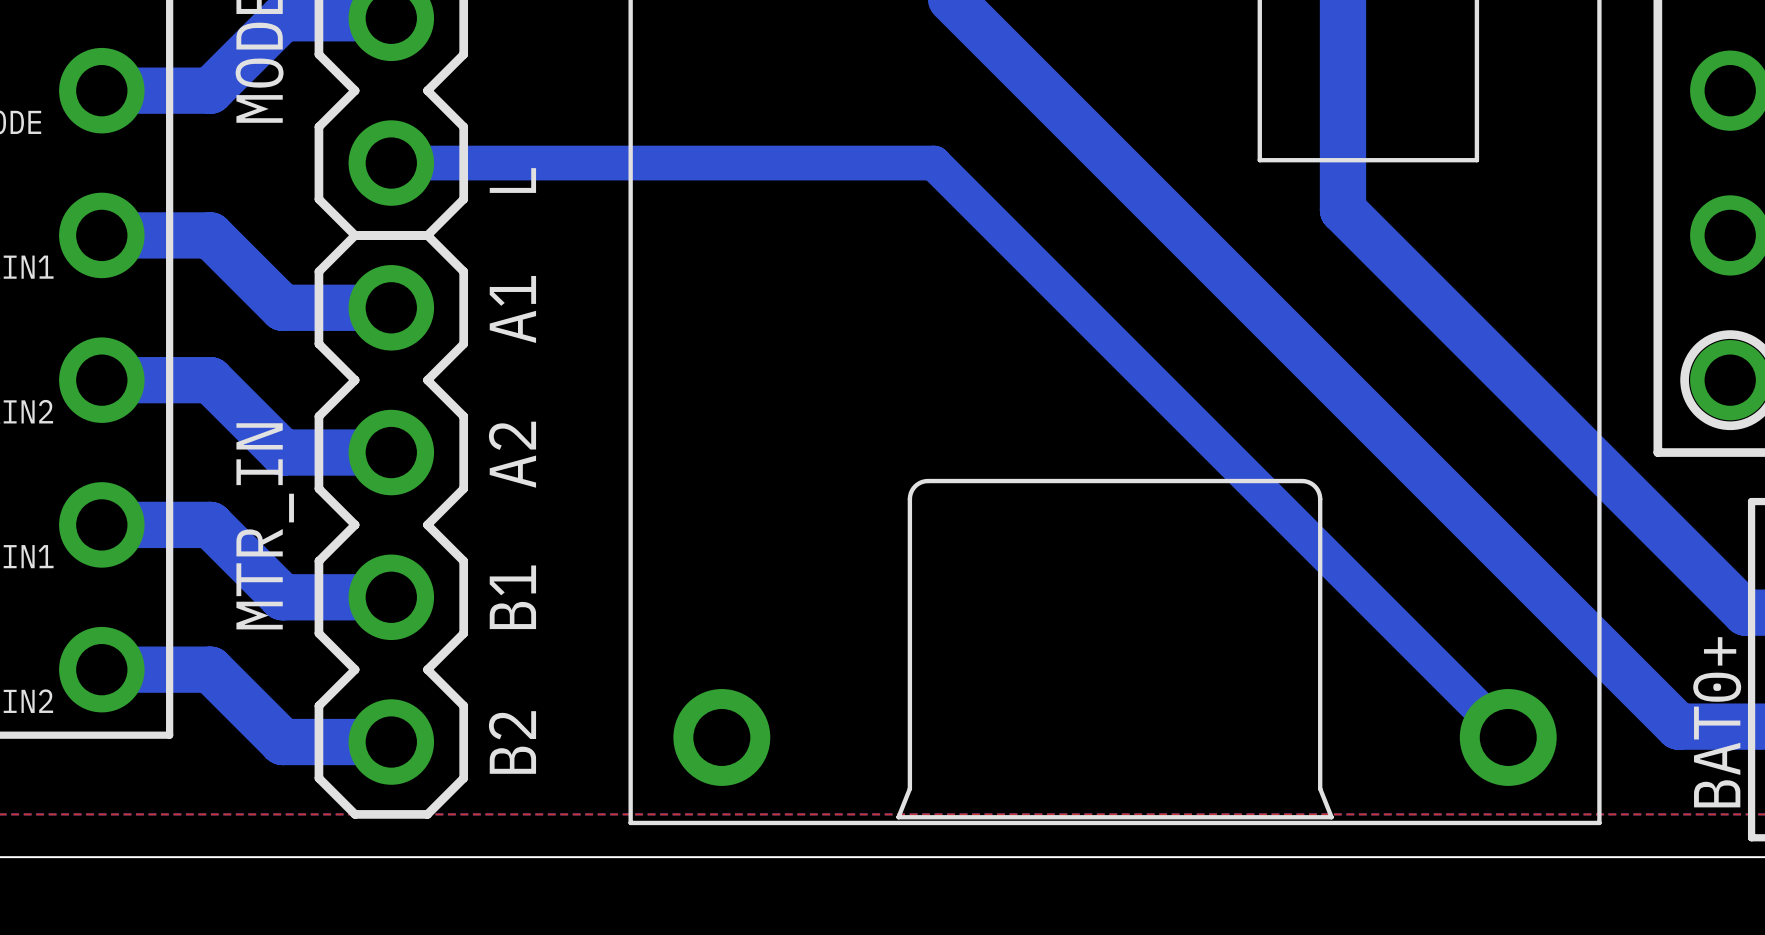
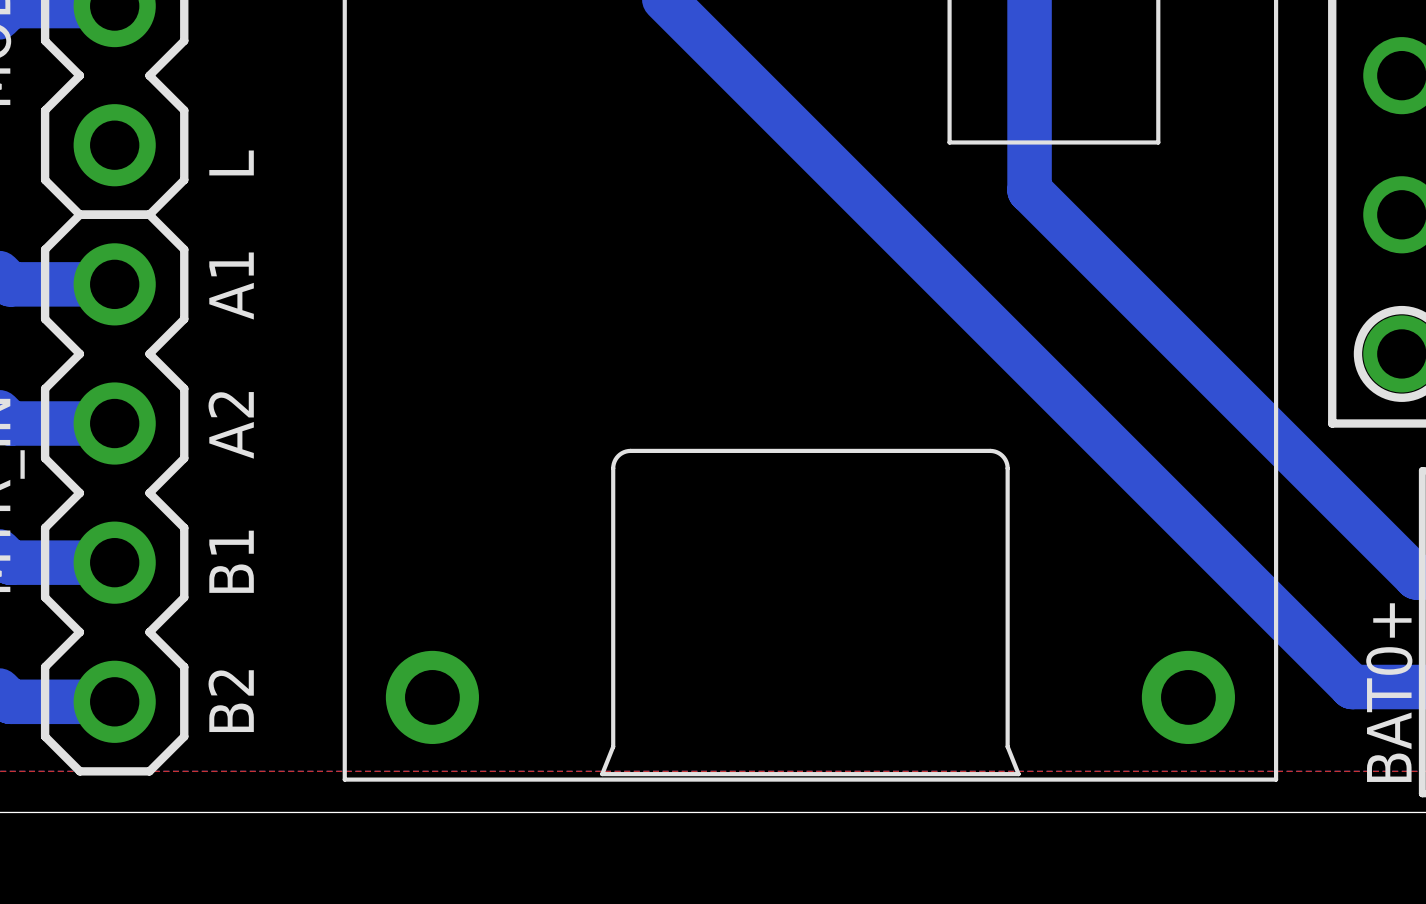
bottom track: (391, 163) (933, 163) (1508, 737) -> none

